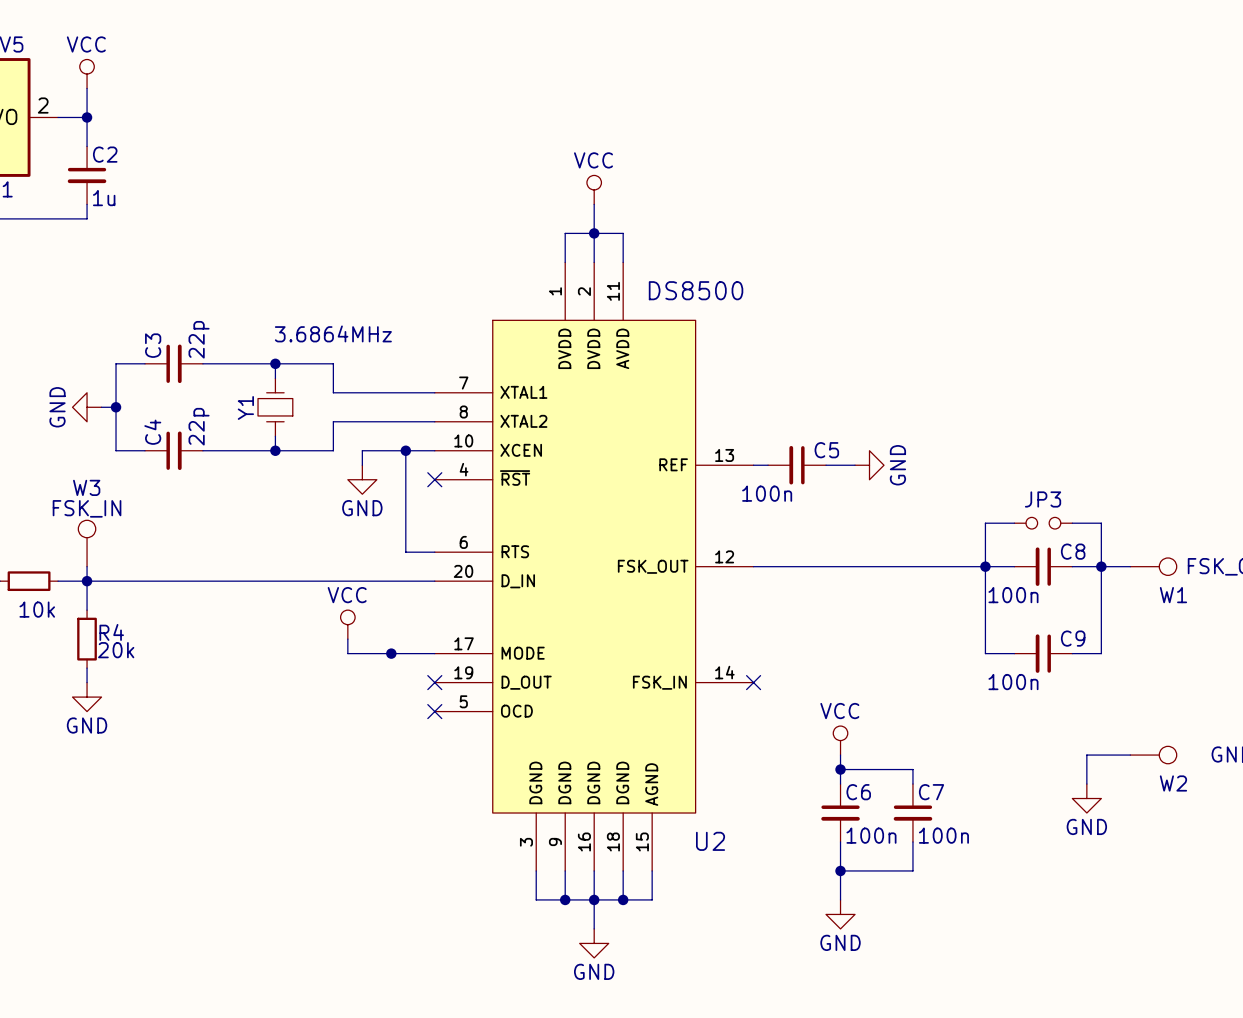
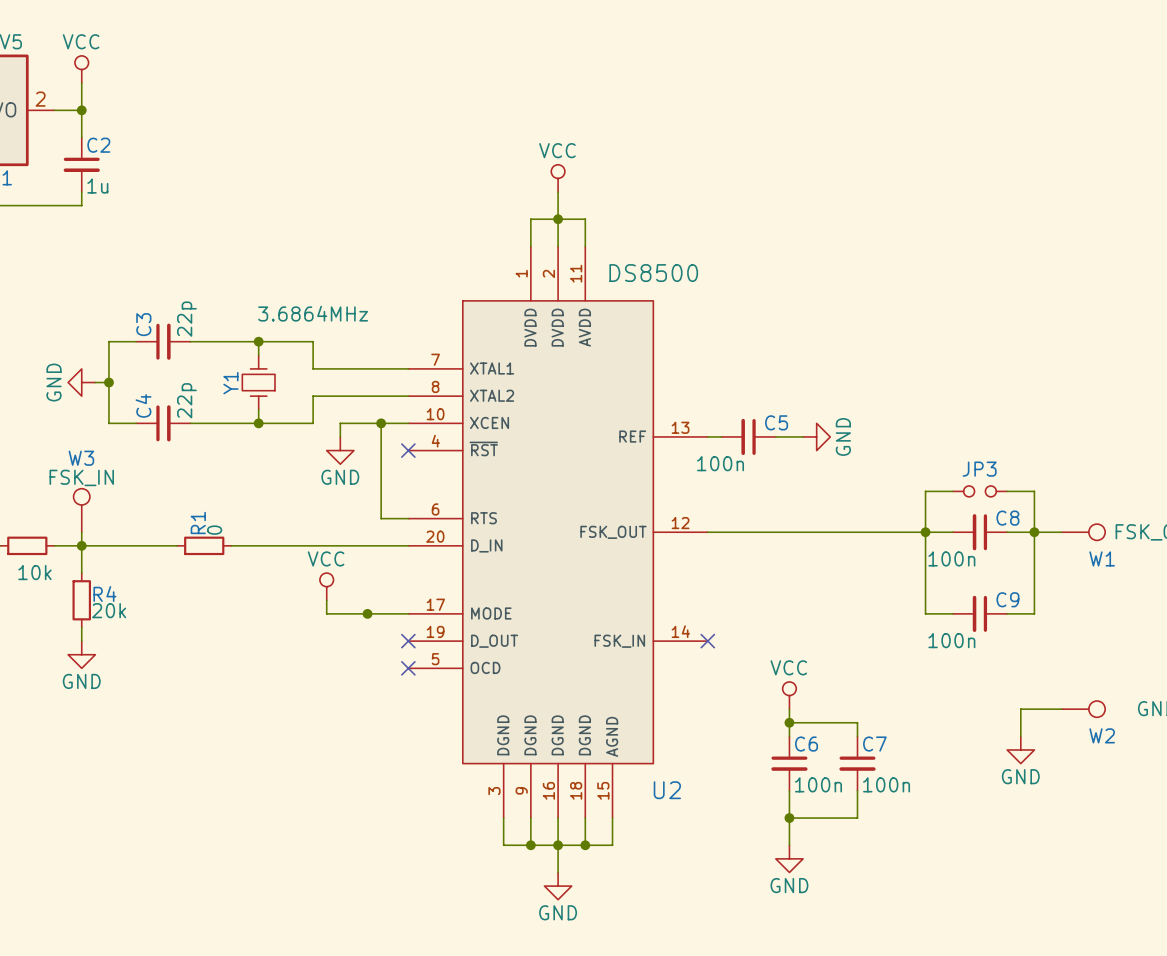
wire: (188, 581) (246, 581) -> none
R1: none -> 0 (204, 545)

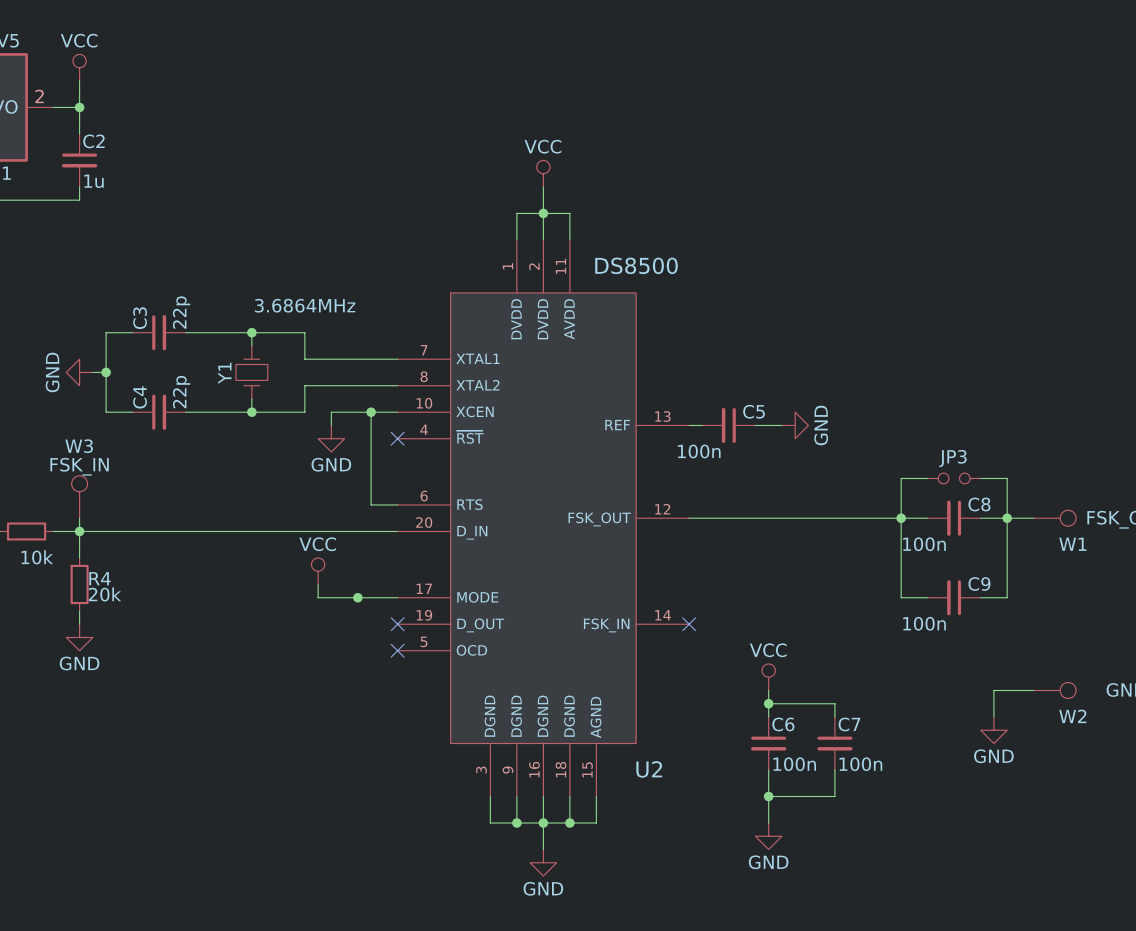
wire: none -> (172, 531) (225, 531)
R1: 0 (204, 545) -> none

